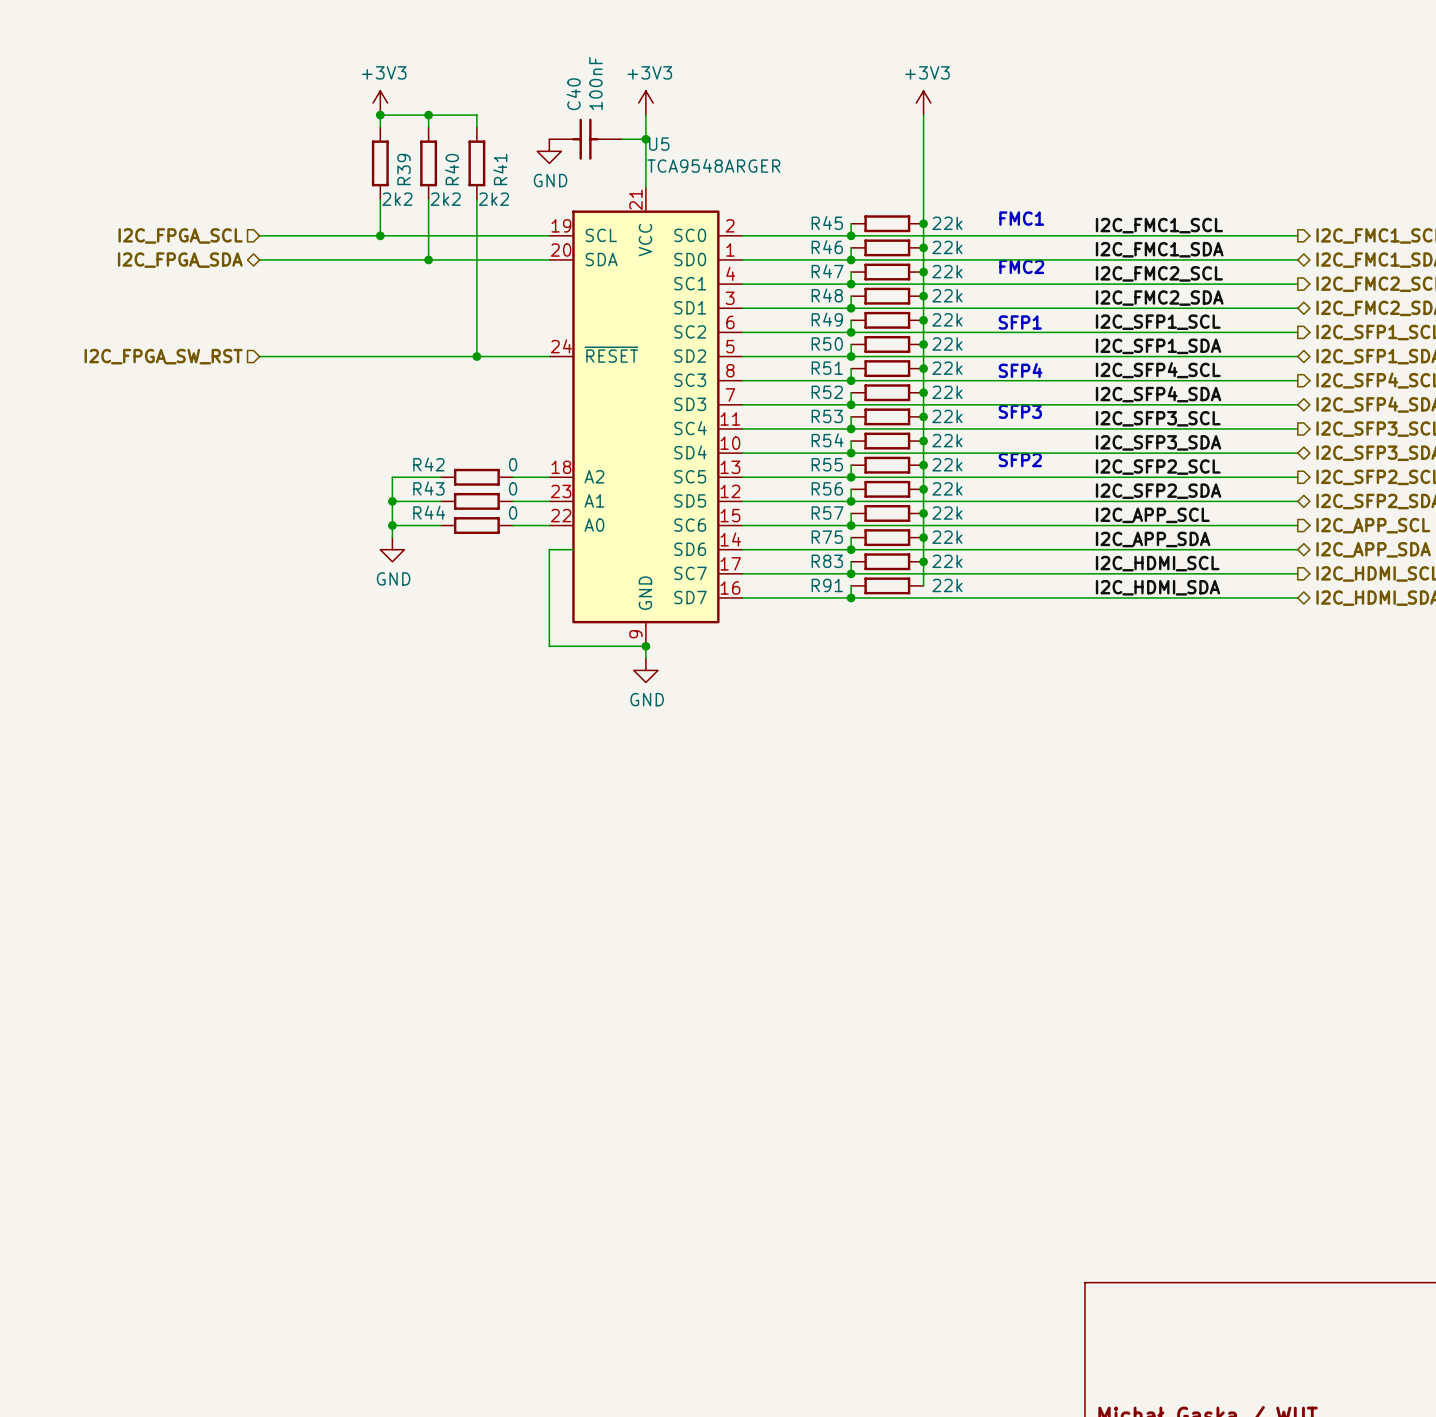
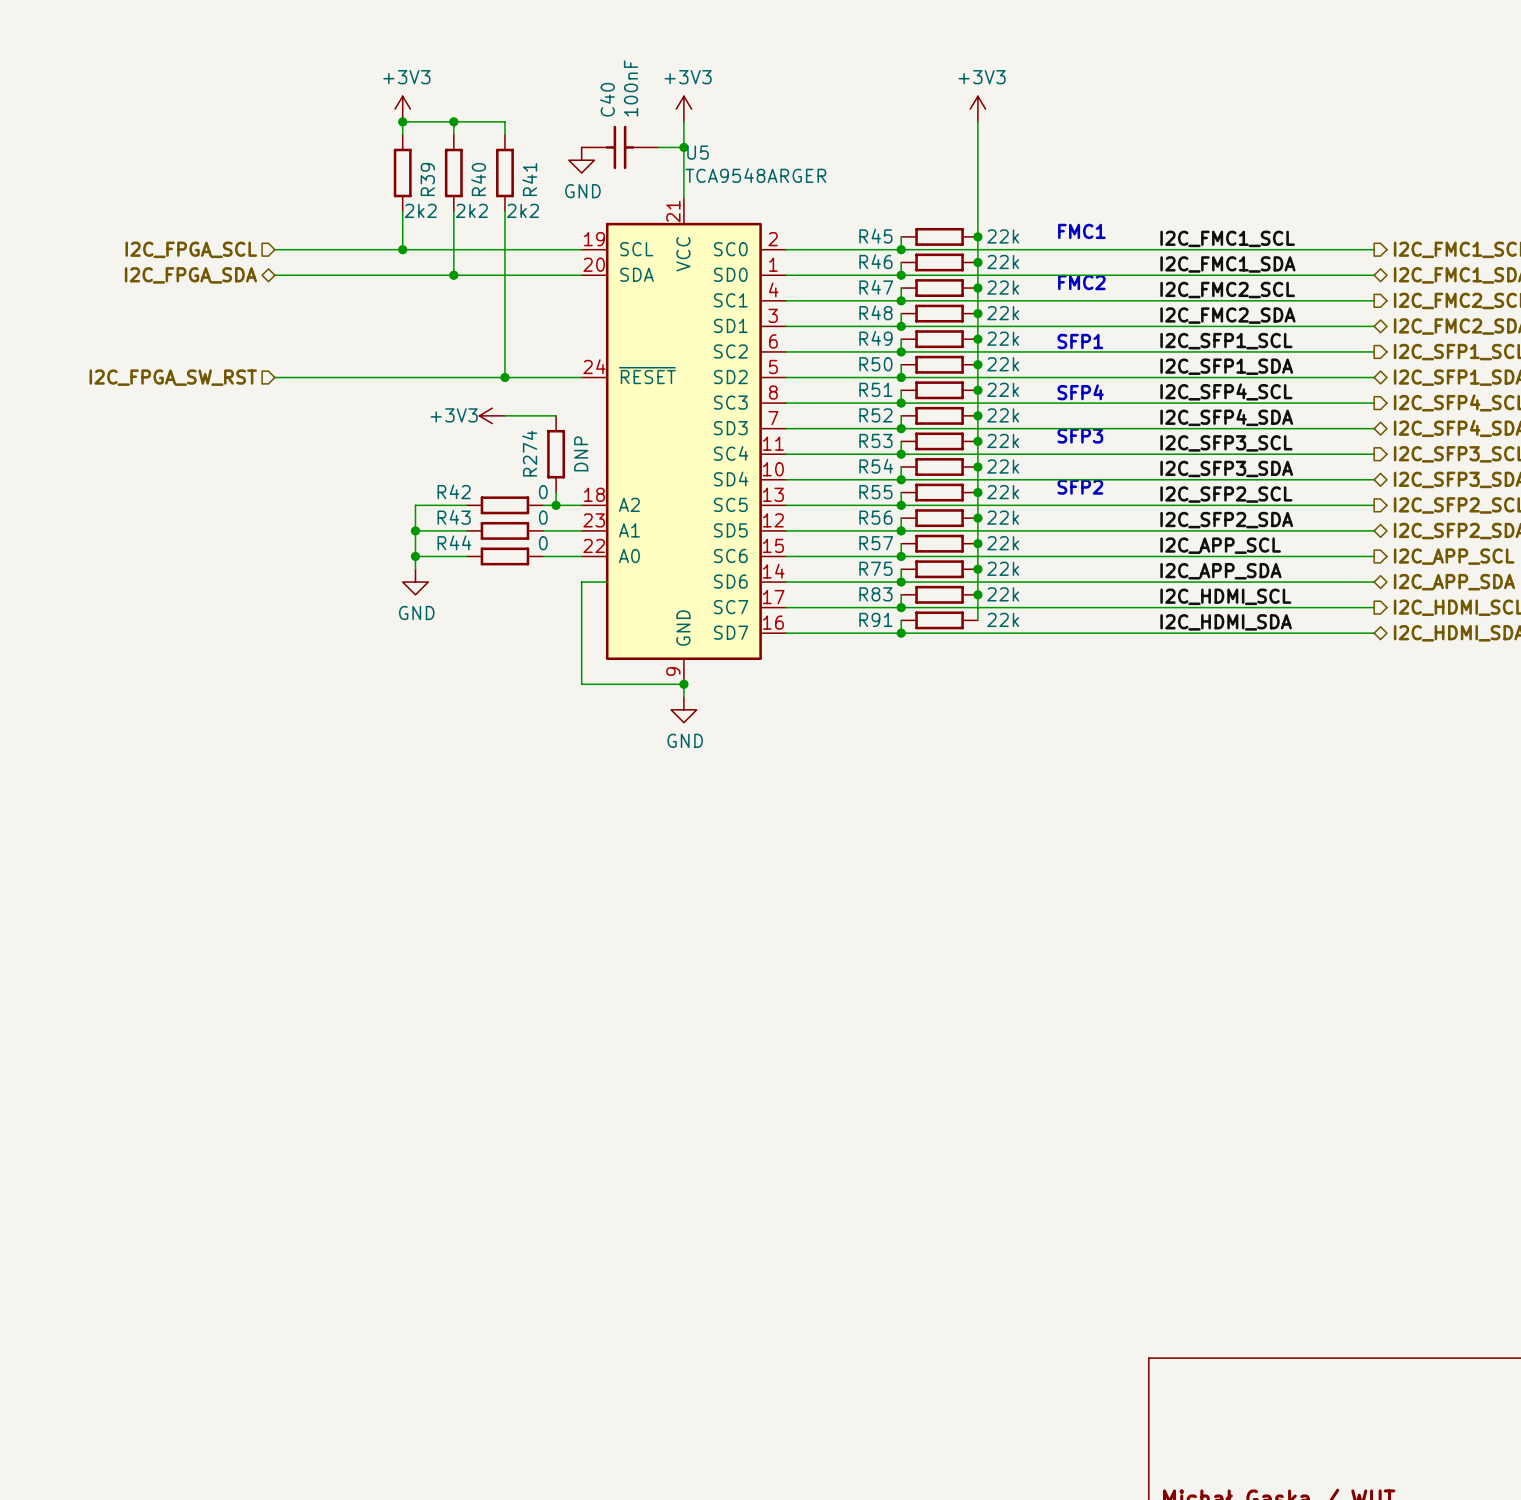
power symbol: none -> +3V3 (492, 415)
wire: none -> (504, 415) (556, 415)
R274: none -> (556, 454)
wire: none -> (556, 492) (556, 505)
junction: none -> (556, 505)

